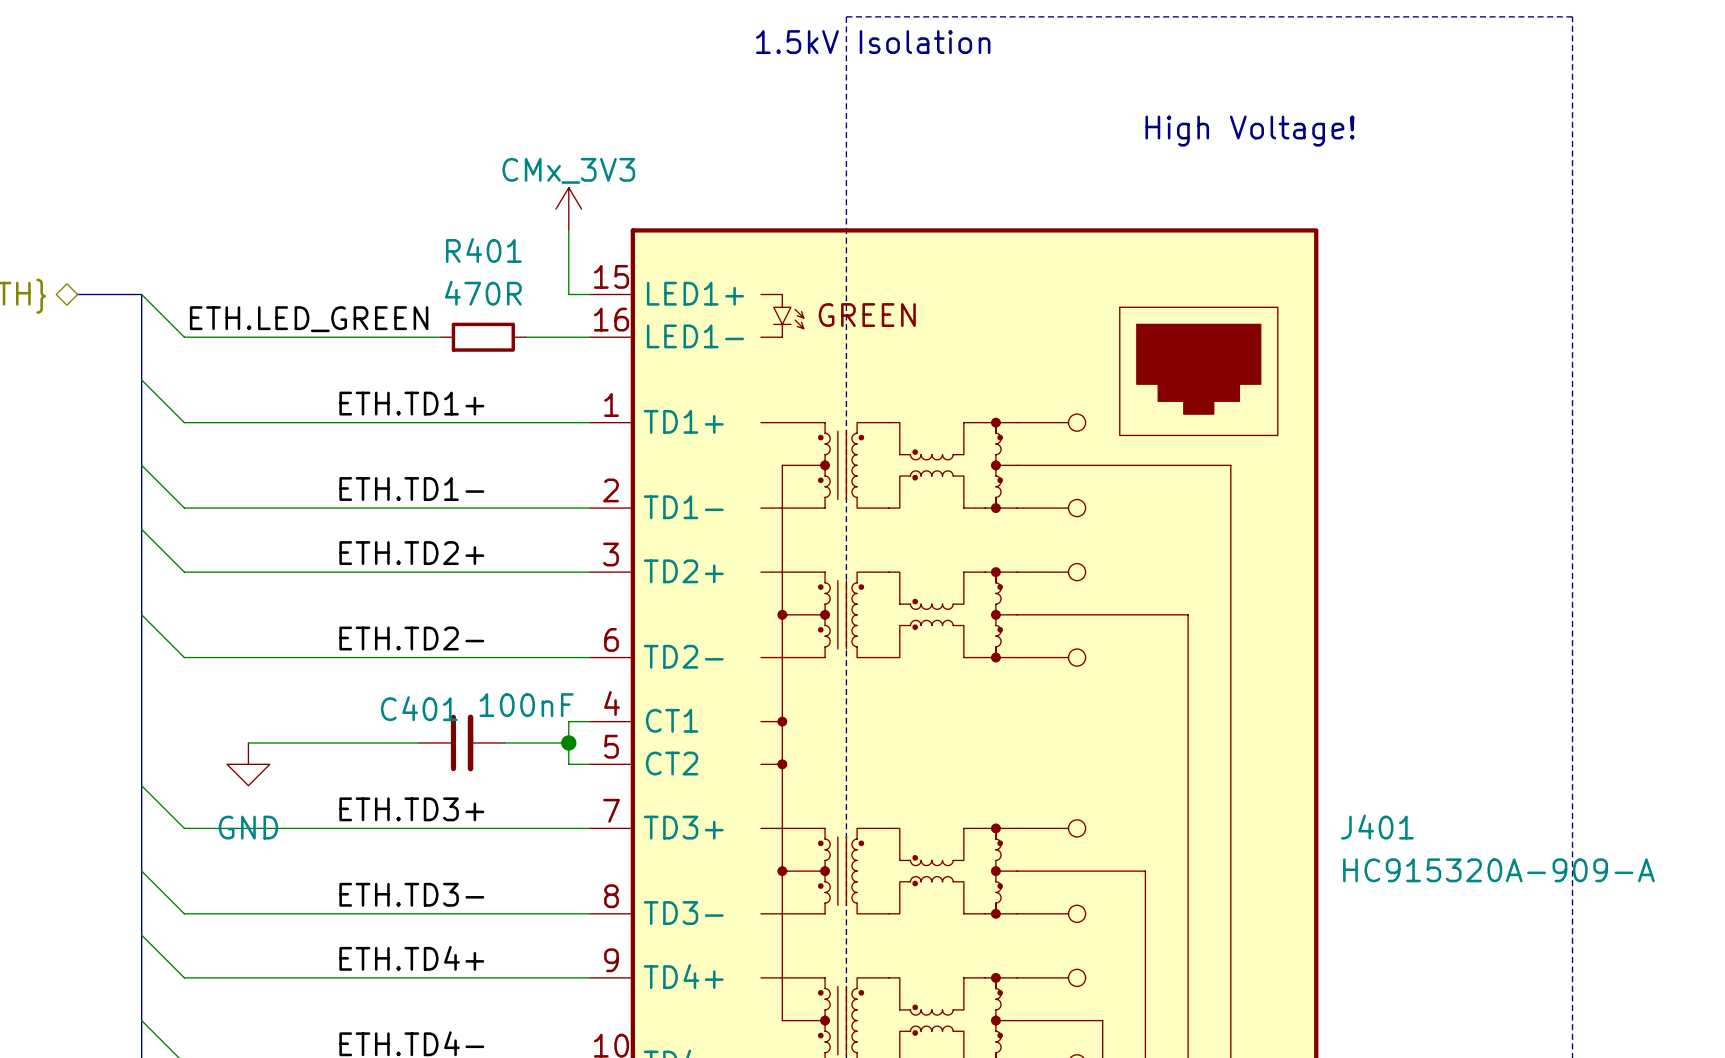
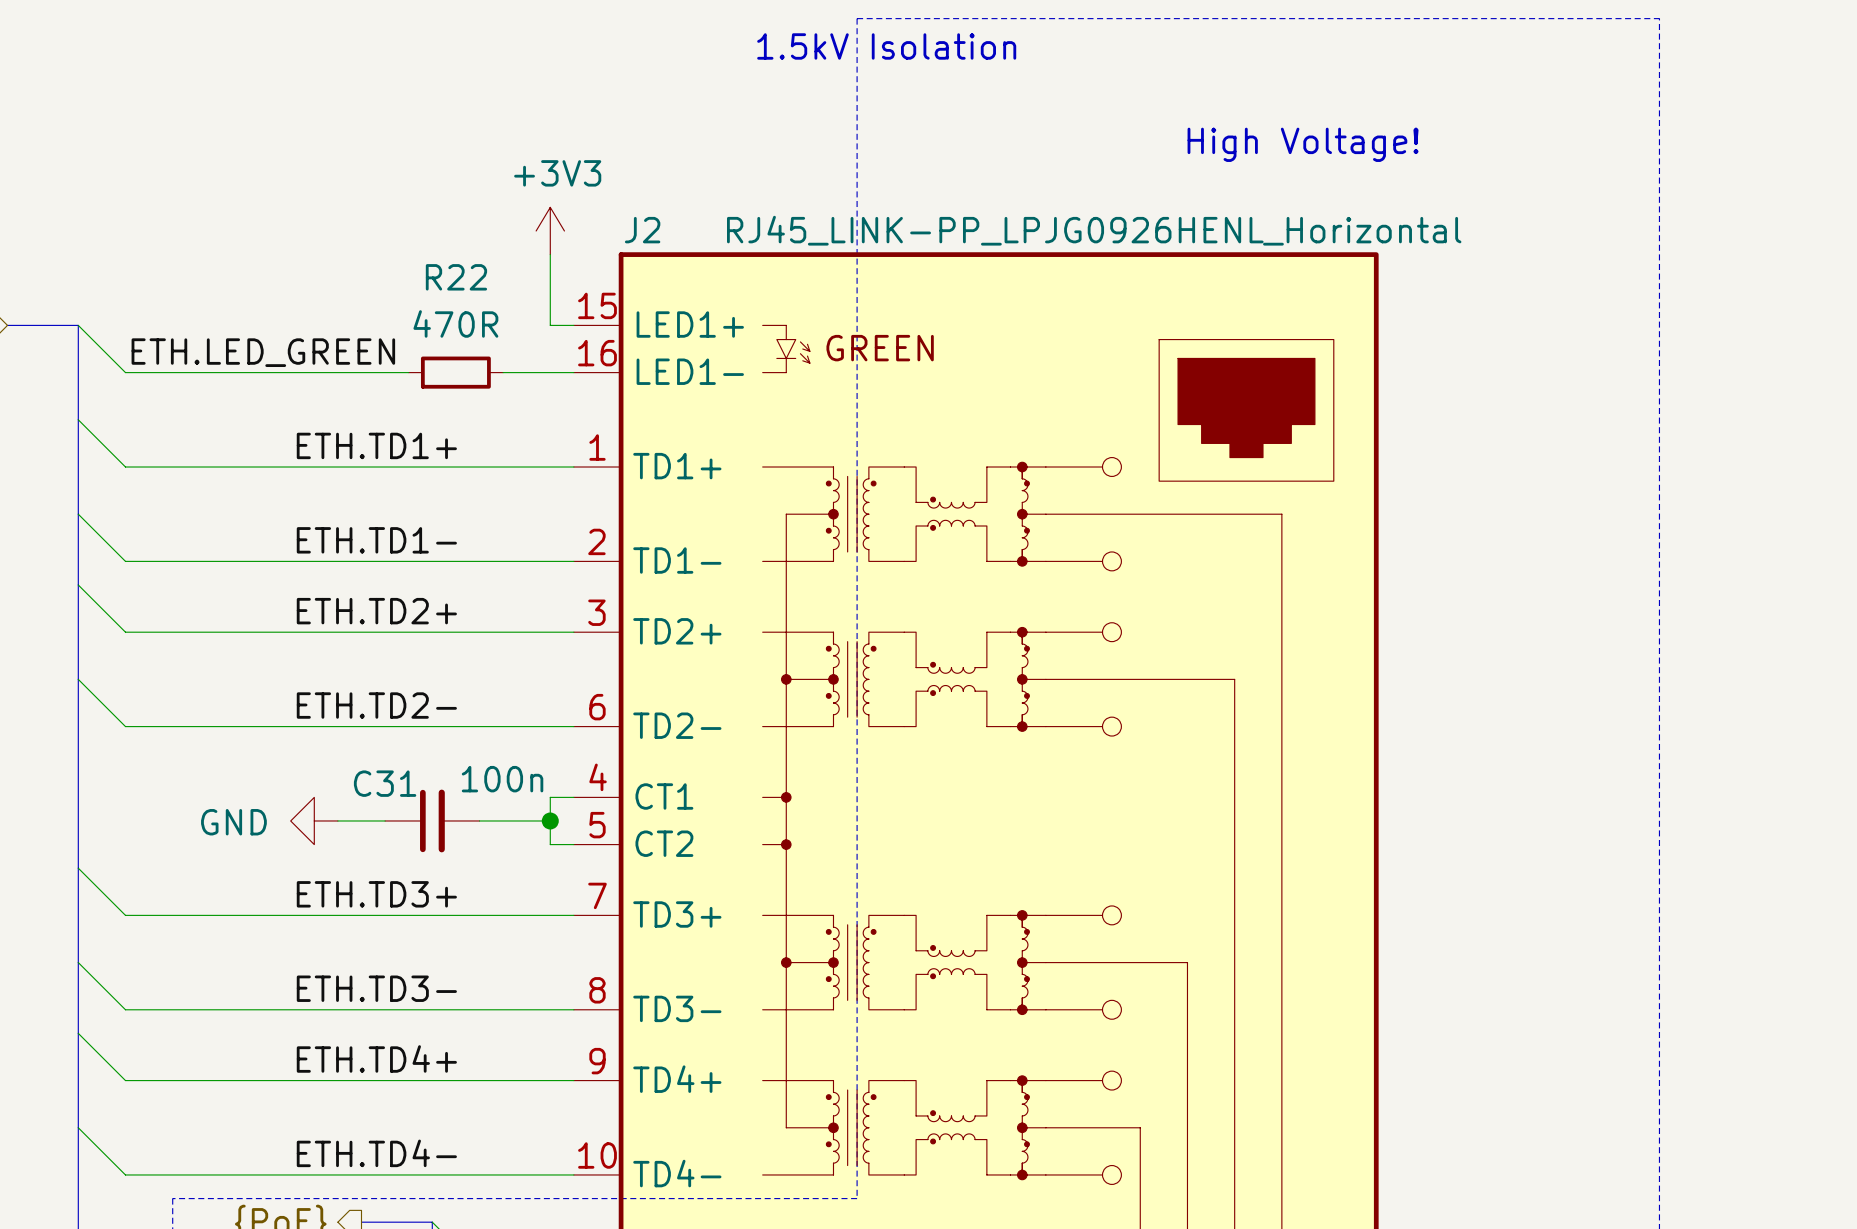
power symbol: CMx_3V3 (568, 209) -> +3V3 (550, 231)
R401 name: R401 (483, 250) -> R22 (456, 277)
C401 value: 100nF (526, 705) -> 100n (502, 779)
C401 name: C401 (419, 708) -> C31 (385, 783)
wire: (248, 742) (376, 742) -> none
power symbol rotation: 0° (248, 764) -> 90° clockwise (314, 820)
power symbol position: GND (248, 764) -> GND (314, 820)
J401 name: J401 (1377, 827) -> J2 (642, 230)
J401 value: HC915320A-909-A (1498, 870) -> RJ45_LINK-PP_LPJG0926HENL_Horizontal (1094, 230)

